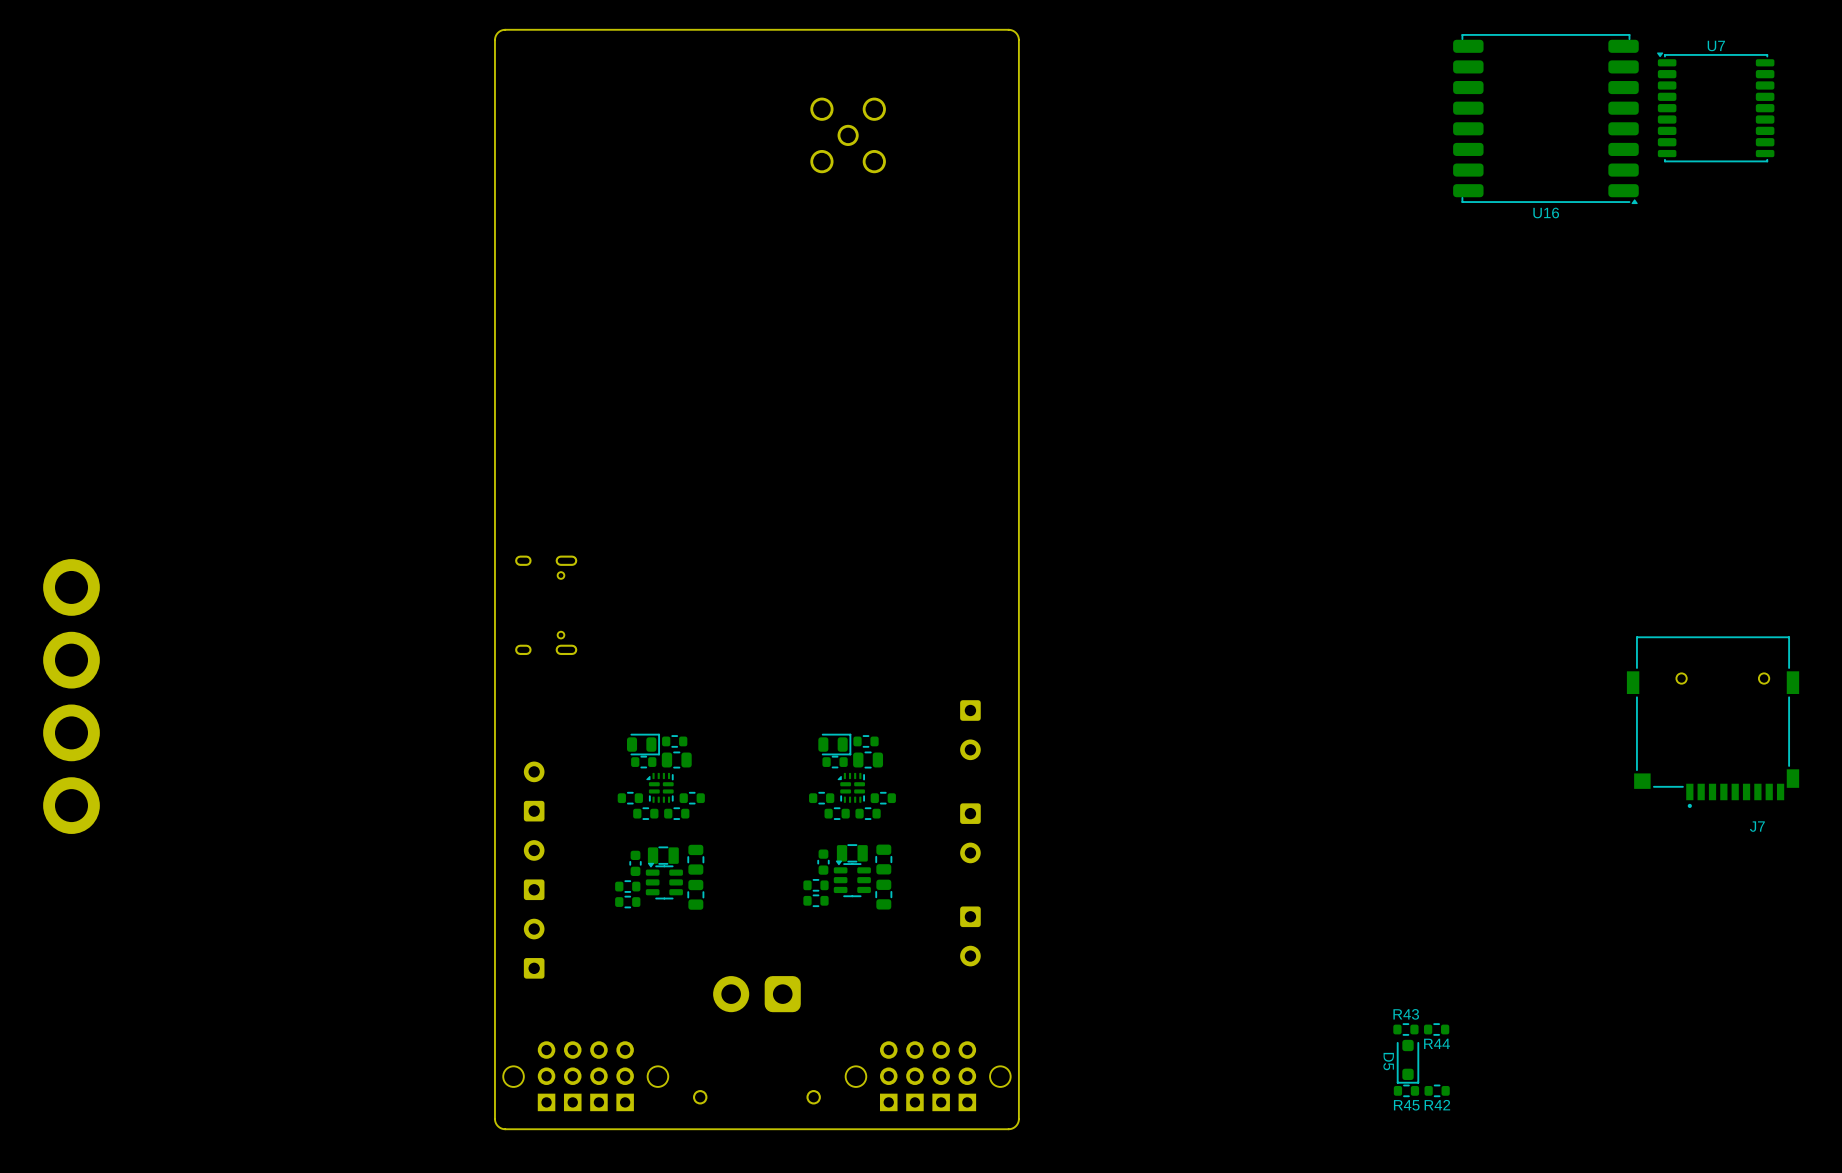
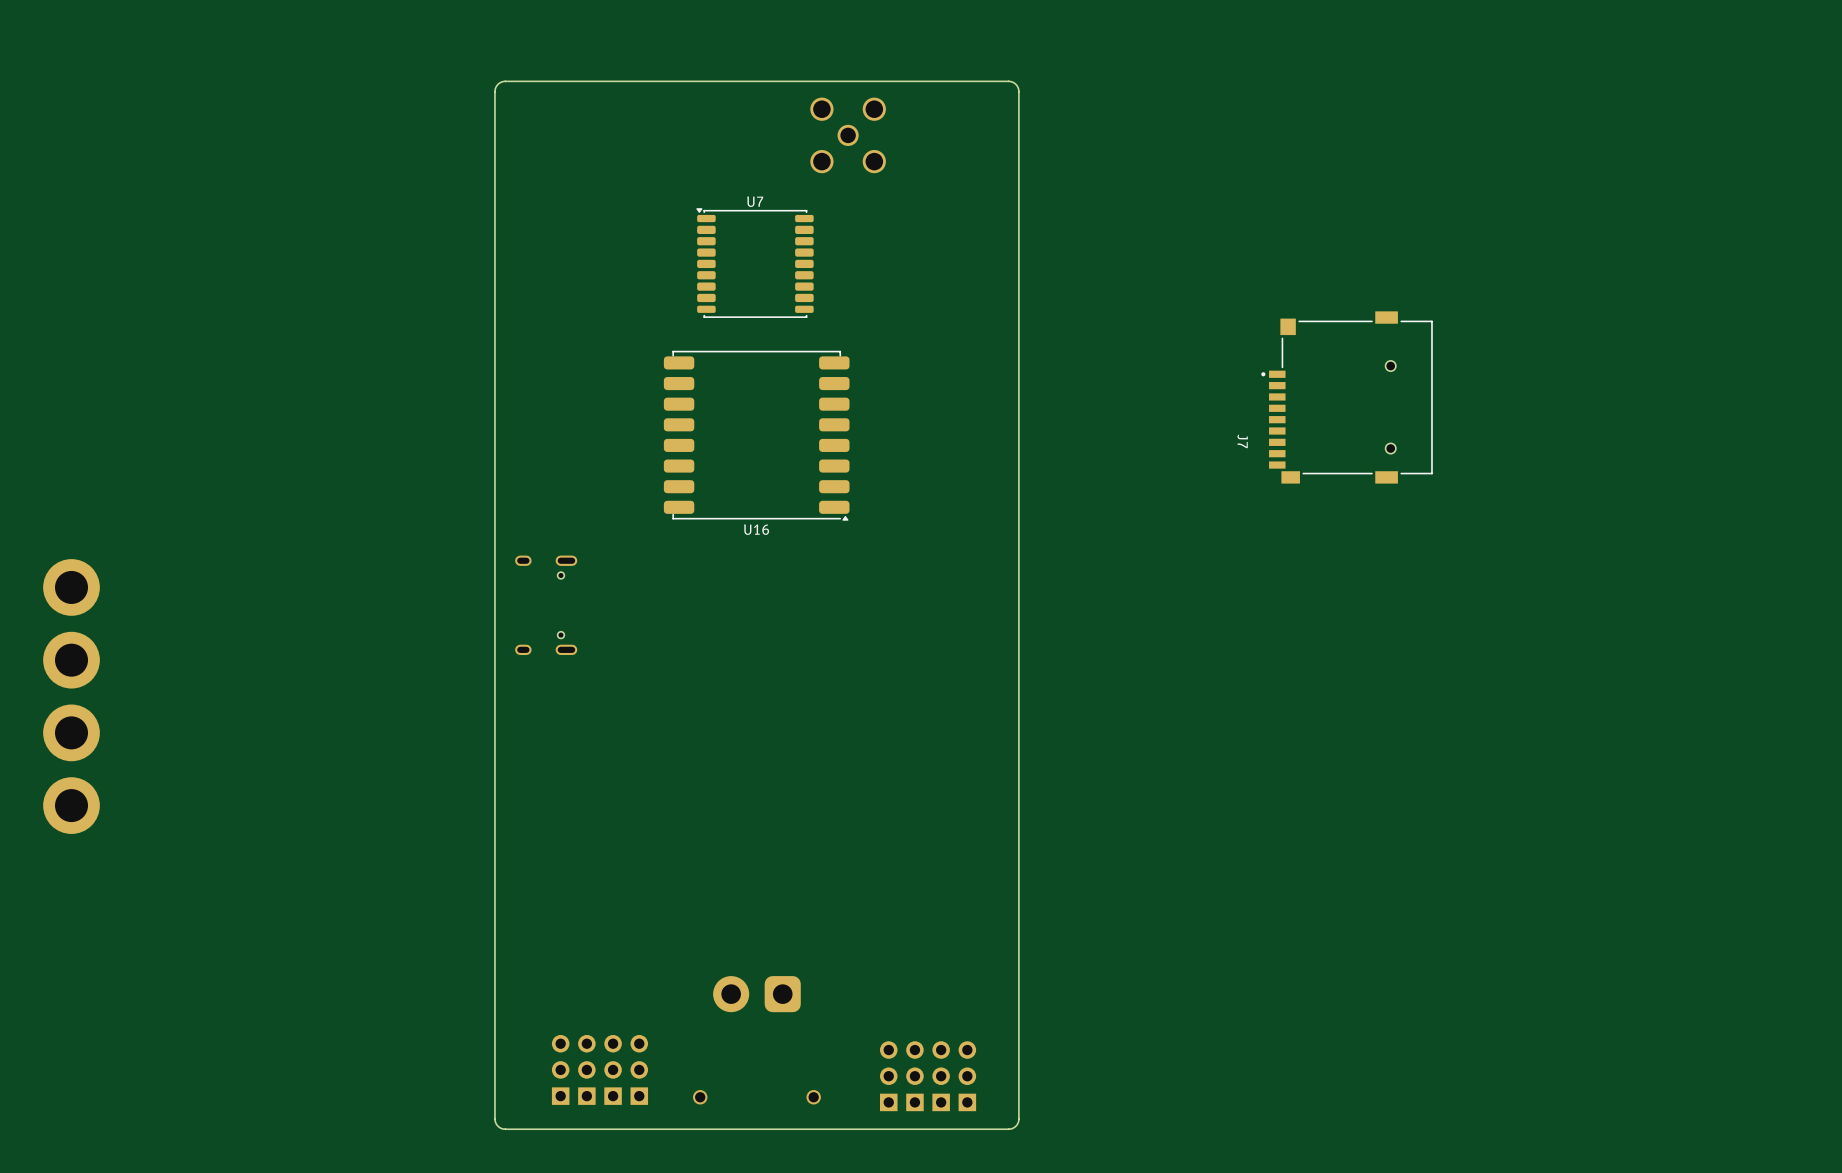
board edge: (1018, 91) (1018, 38) (1015, 32) (1008, 29) (504, 29) (498, 32) (495, 38) (494, 91) -> (1018, 91) (1015, 84) (1008, 81) (505, 81) (498, 84) (494, 91)
U7 position: (1715, 107) -> (754, 262)
U16 position: (1545, 119) -> (756, 435)
J7 rotation: 0° (1713, 722) -> 90° clockwise (1346, 397)
J7 position: (1713, 722) -> (1346, 397)
part: (970, 730) -> none
part: (674, 741) -> none
part: (866, 741) -> none
part: (643, 744) -> none
part: (834, 744) -> none
part: (676, 760) -> none
part: (868, 760) -> none
part: (643, 762) -> none
part: (835, 762) -> none
part: (660, 787) -> none
part: (851, 787) -> none
part: (534, 791) -> none
part: (630, 798) -> none
part: (692, 798) -> none
part: (821, 798) -> none
part: (883, 798) -> none
part: (645, 813) -> none
part: (676, 813) -> none
part: (837, 813) -> none
part: (868, 813) -> none
part: (970, 833) -> none
part: (852, 853) -> none
part: (663, 855) -> none
part: (695, 859) -> none
part: (883, 859) -> none
part: (823, 862) -> none
part: (635, 863) -> none
part: (534, 870) -> none
part: (852, 878) -> none
part: (664, 880) -> none
part: (815, 885) -> none
part: (627, 886) -> none
part: (695, 894) -> none
part: (883, 894) -> none
part: (815, 900) -> none
part: (627, 902) -> none
part: (970, 936) -> none
part: (534, 948) -> none
R43: (1405, 1029) -> none
R44: (1436, 1029) -> none
D5: (1408, 1061) -> none
drawing: [502, 1066, 669, 1088] -> none
drawing: [845, 1066, 1011, 1088] -> none
part: none -> (560, 1069)
part: none -> (586, 1069)
part: none -> (613, 1069)
part: none -> (639, 1069)
part: (546, 1076) -> none
part: (572, 1076) -> none
part: (598, 1076) -> none
part: (625, 1076) -> none
R45: (1406, 1090) -> none
R42: (1437, 1090) -> none

